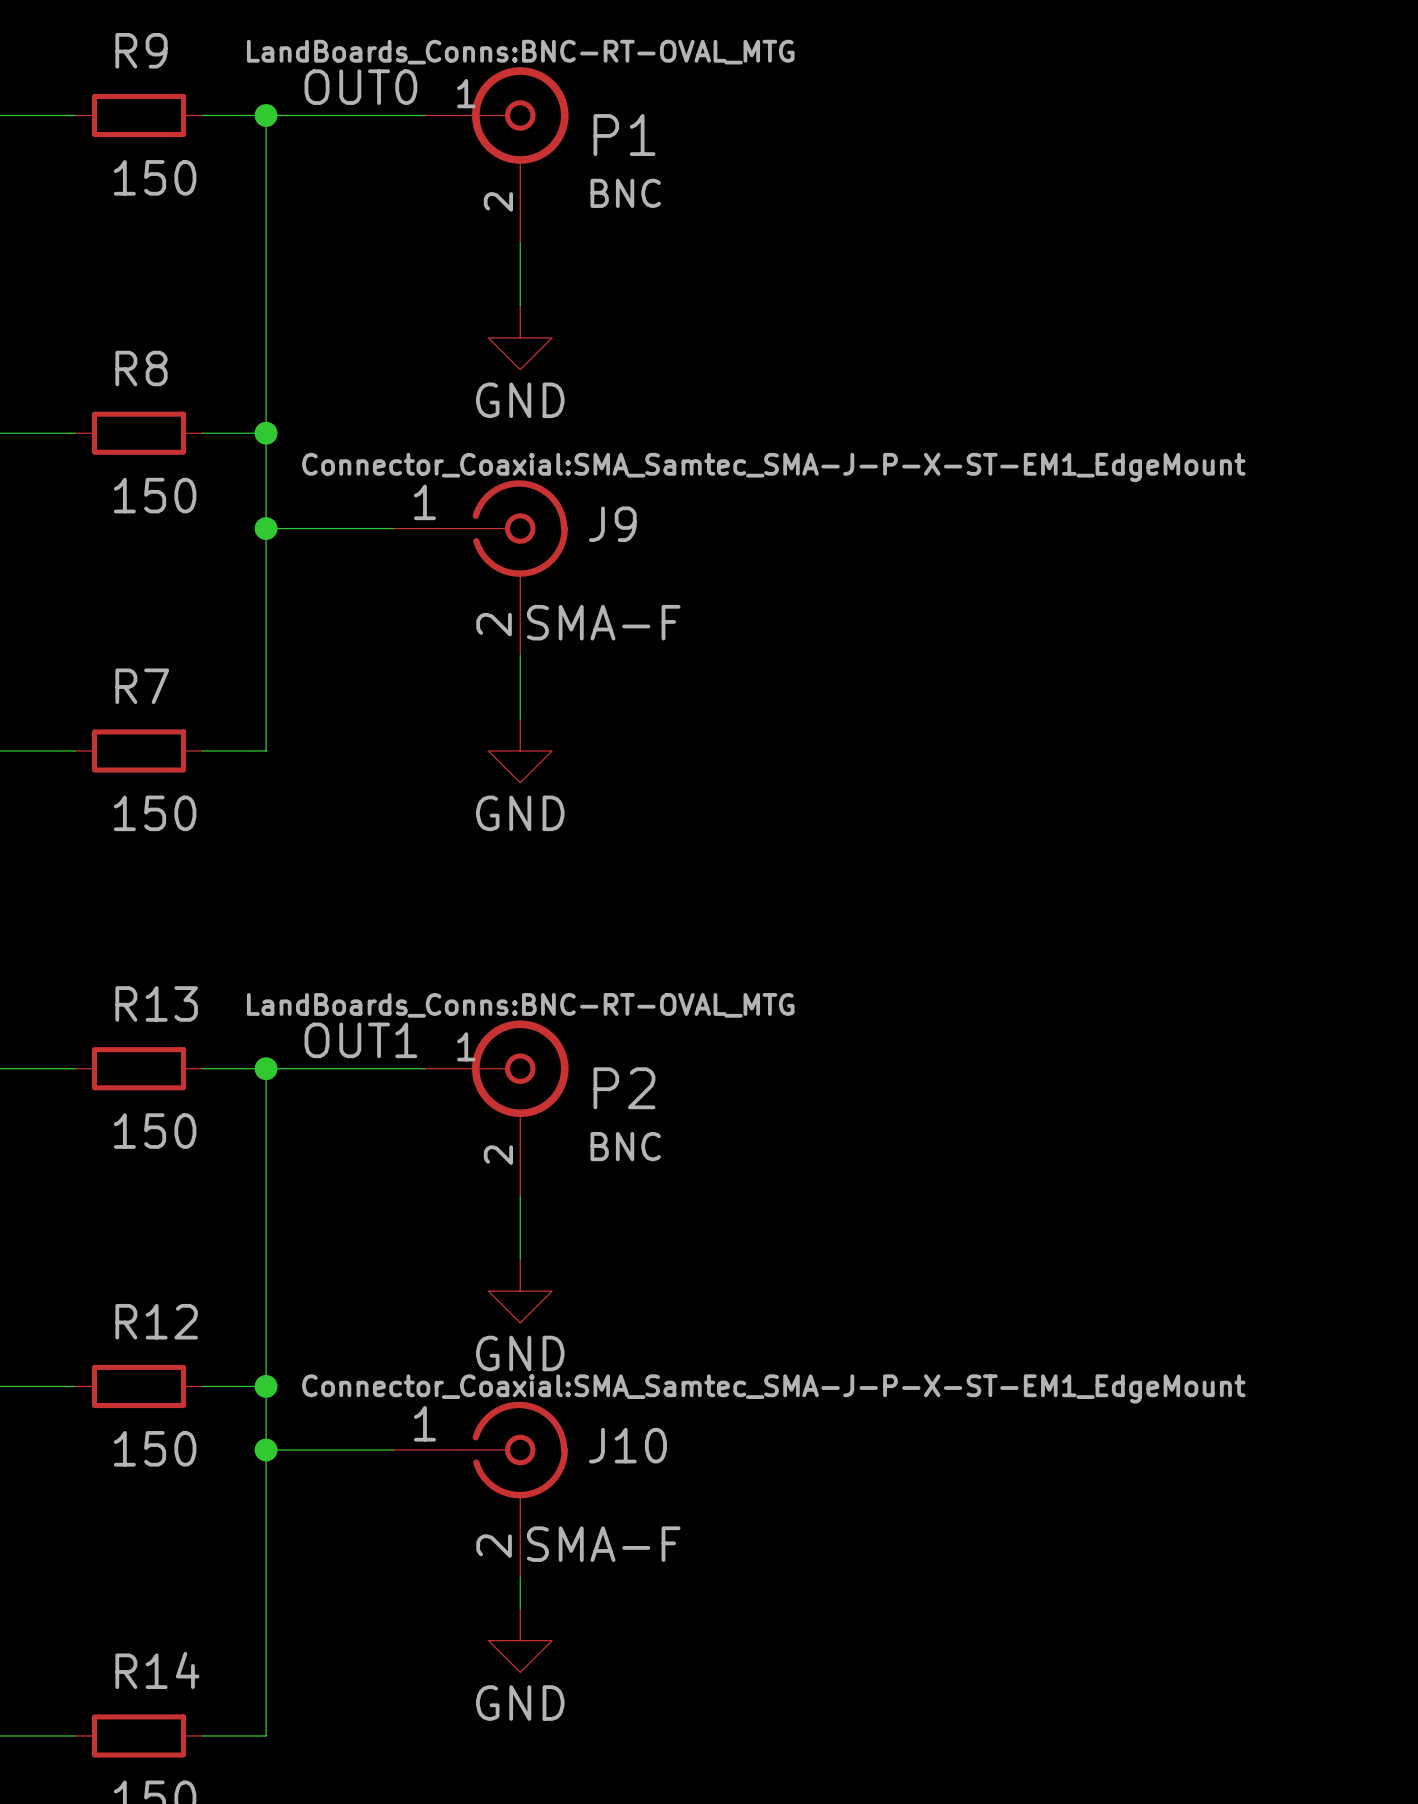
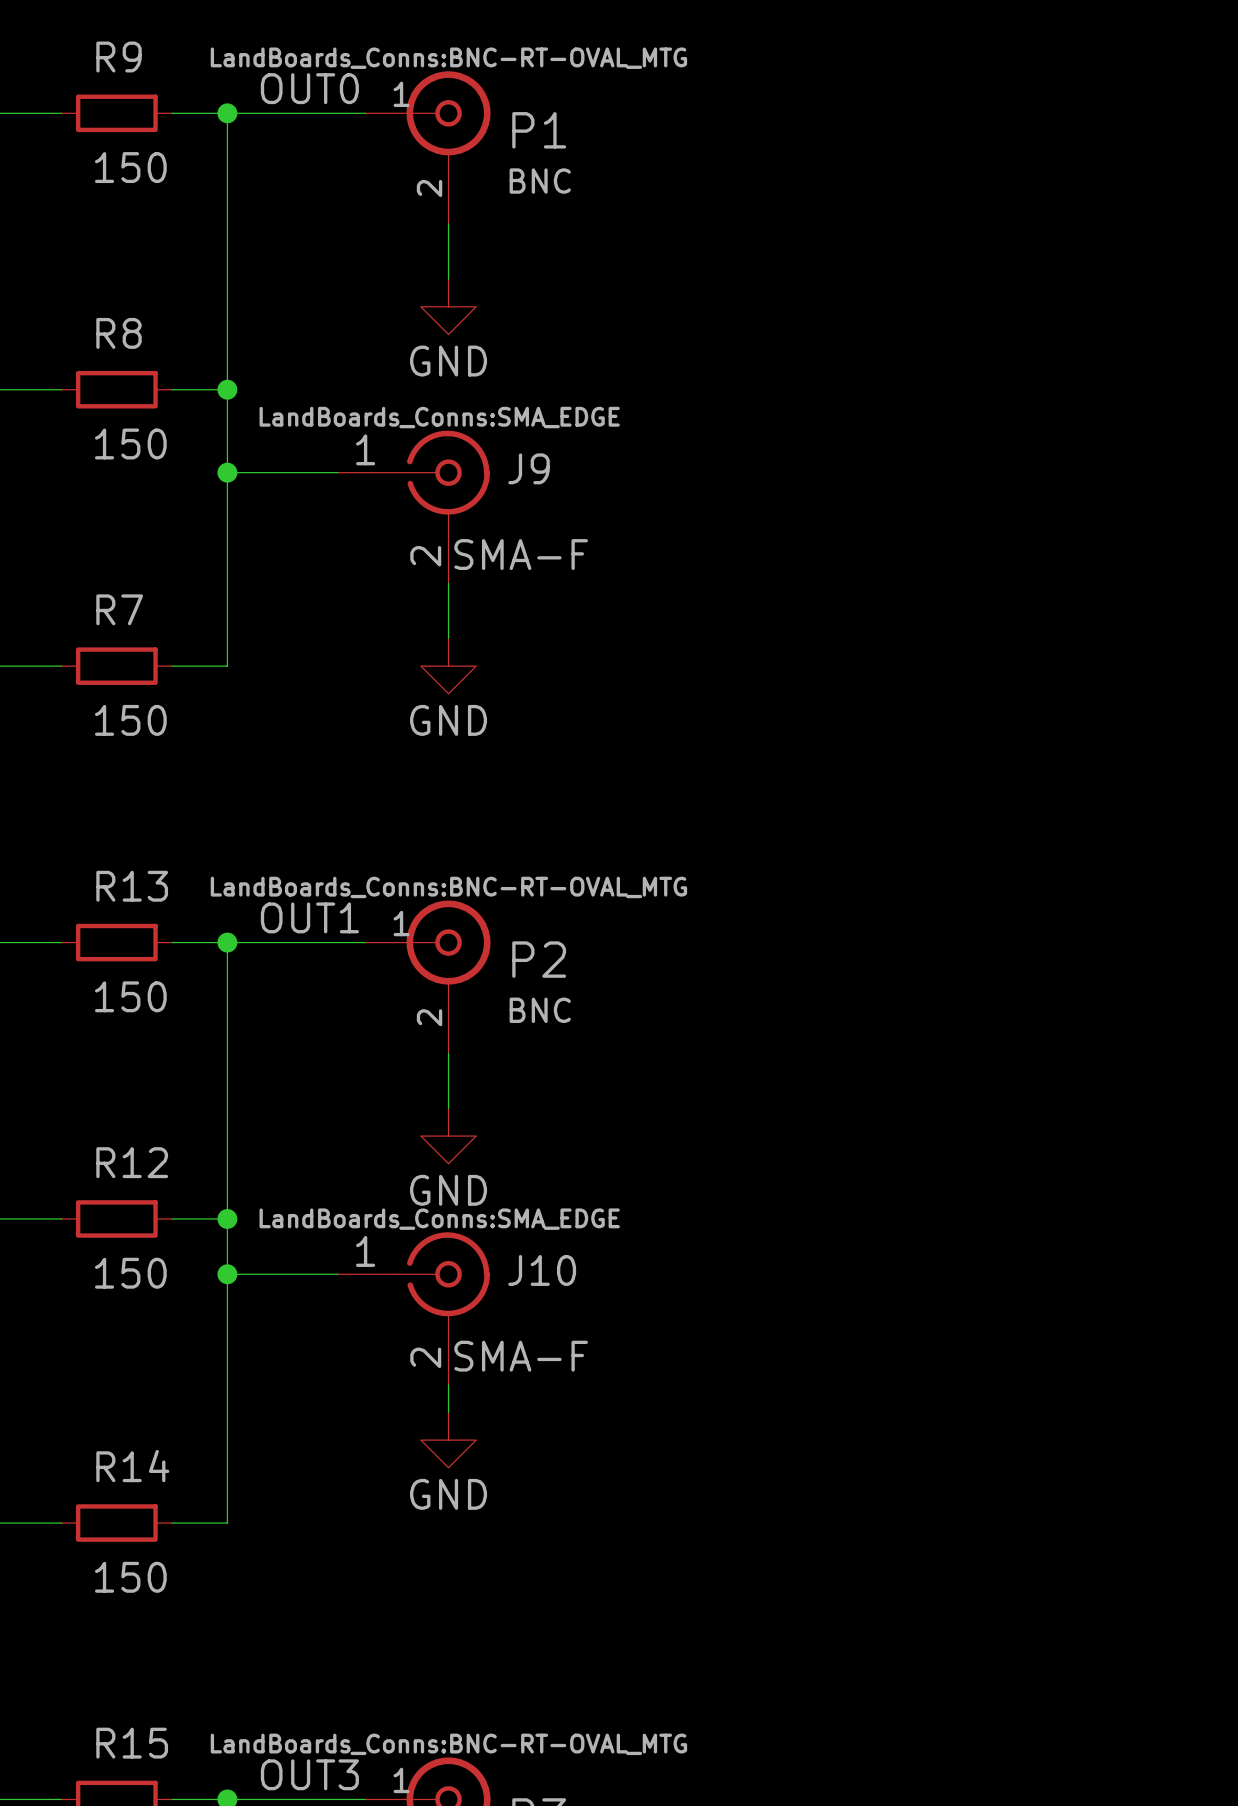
J9 text: Connector_Coaxial:SMA_Samtec_SMA-J-P-X-ST-EM1_EdgeMount (773, 467) -> LandBoards_Conns:SMA_EDGE (439, 417)
J10 text: Connector_Coaxial:SMA_Samtec_SMA-J-P-X-ST-EM1_EdgeMount (773, 1388) -> LandBoards_Conns:SMA_EDGE (439, 1219)

